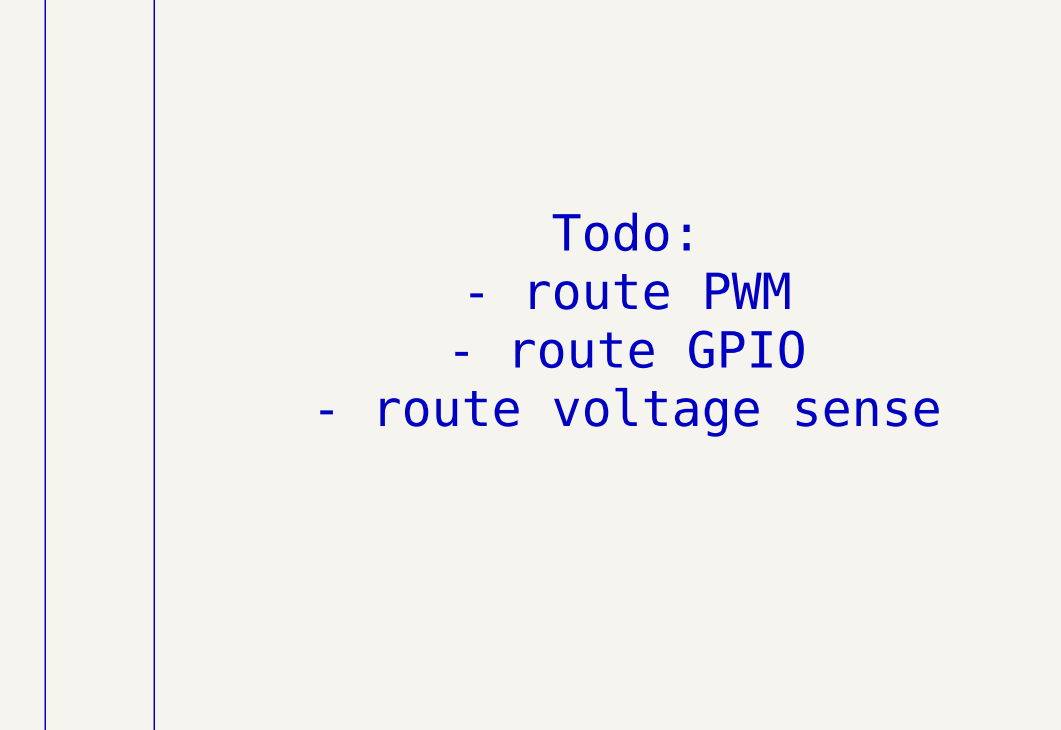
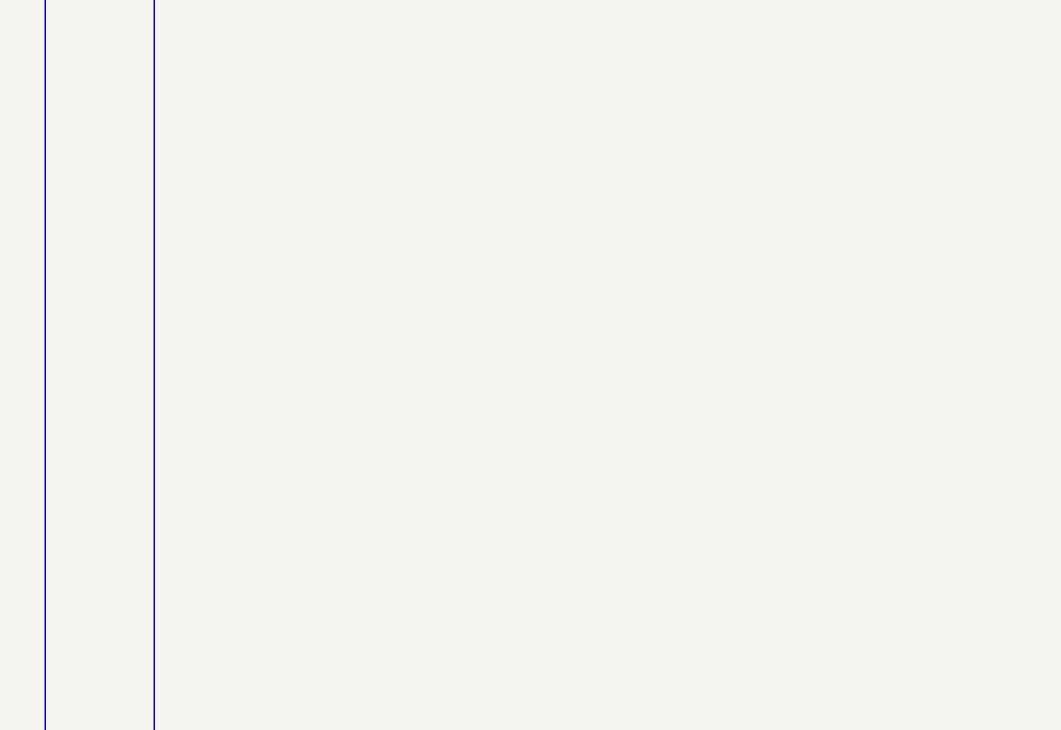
text: Todo: (621, 231) -> none
text: - route PWM (629, 291) -> none
text: - route GPIO (629, 349) -> none
text: - route voltage sense (629, 412) -> none

